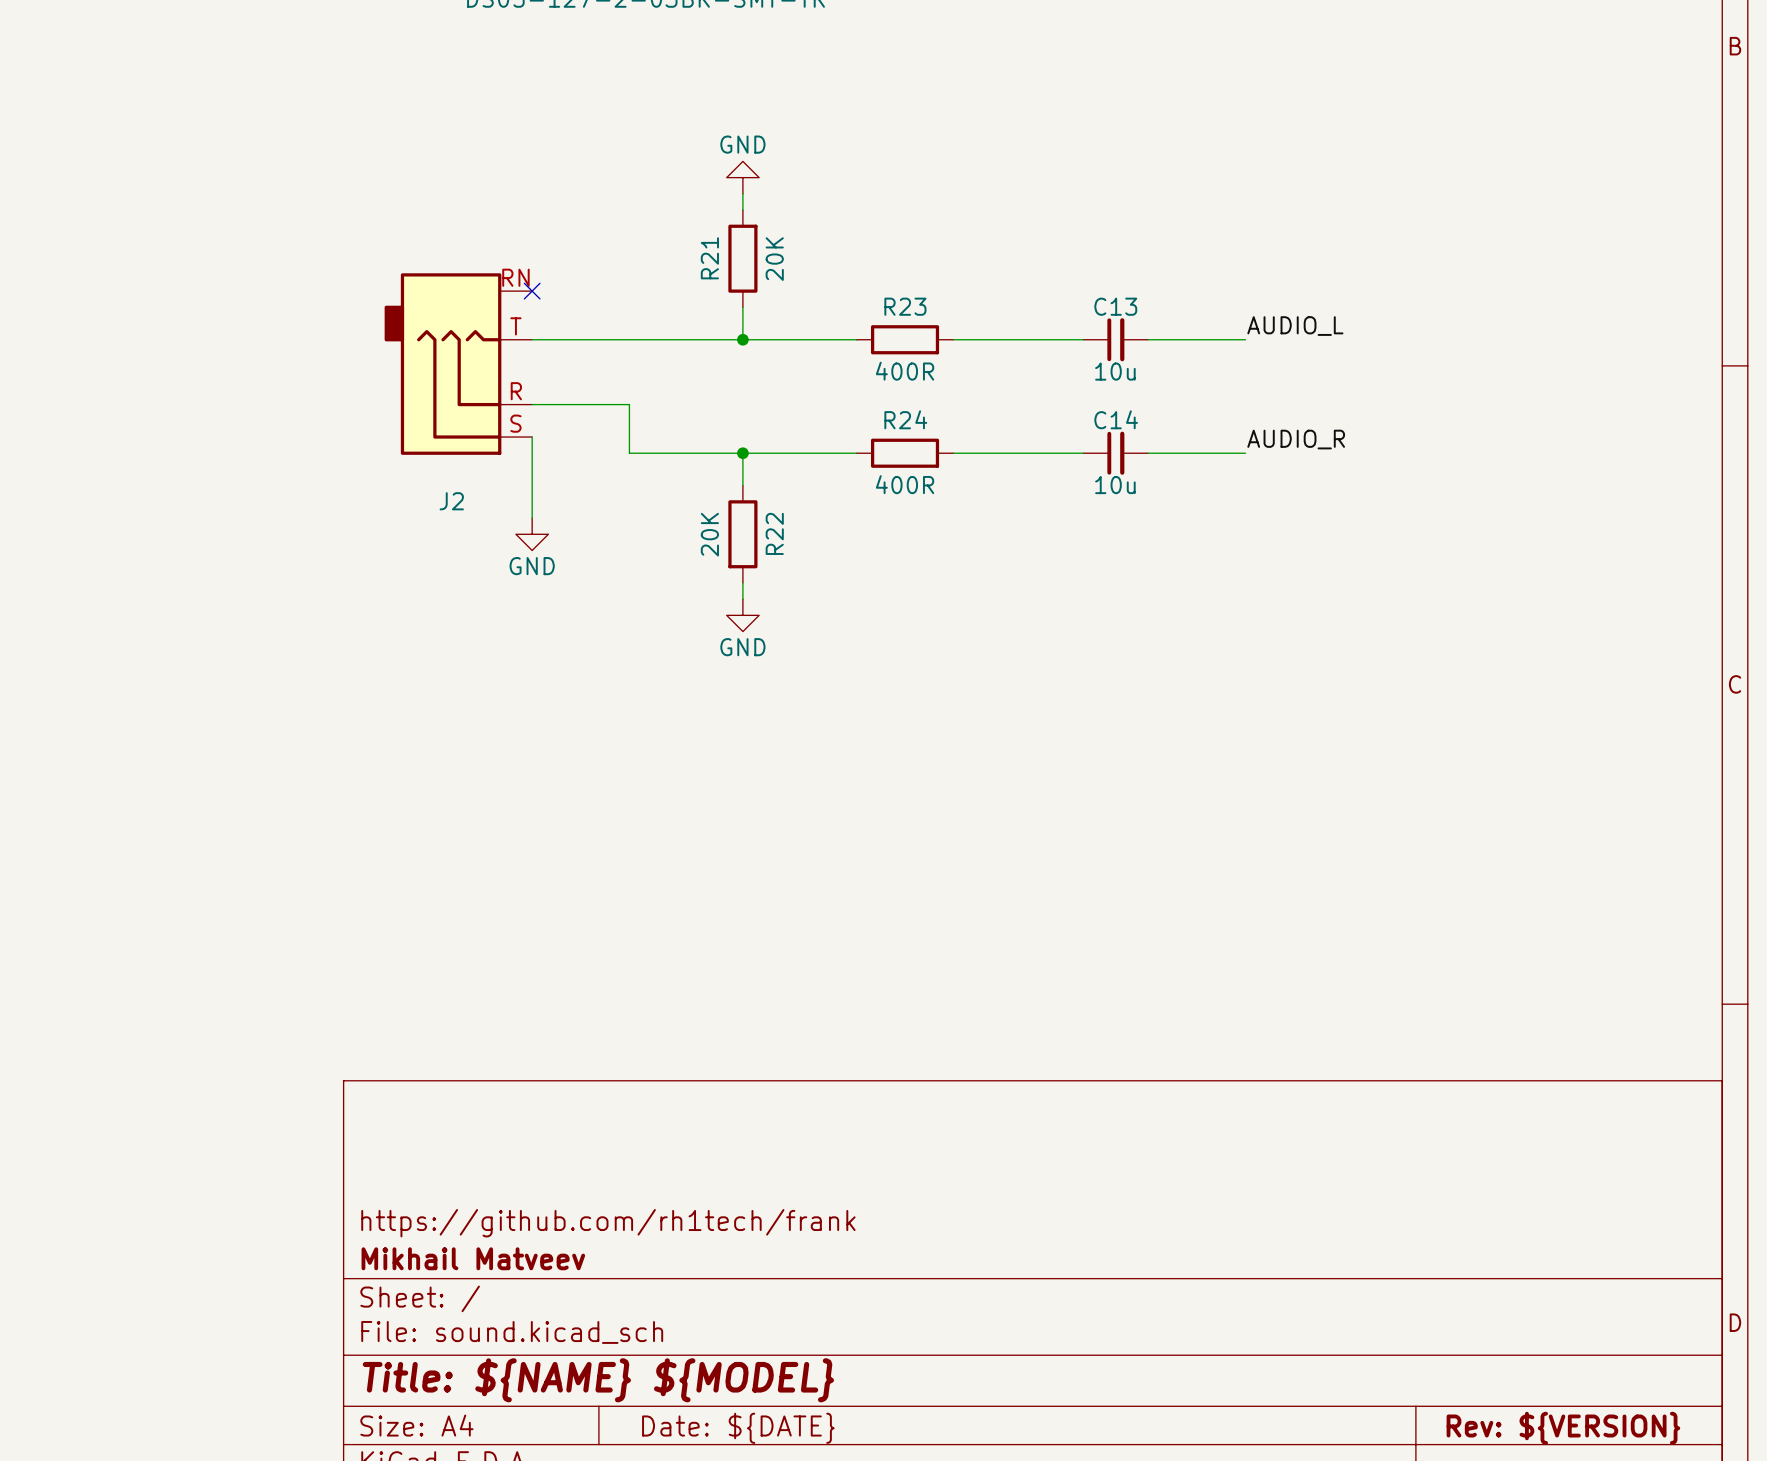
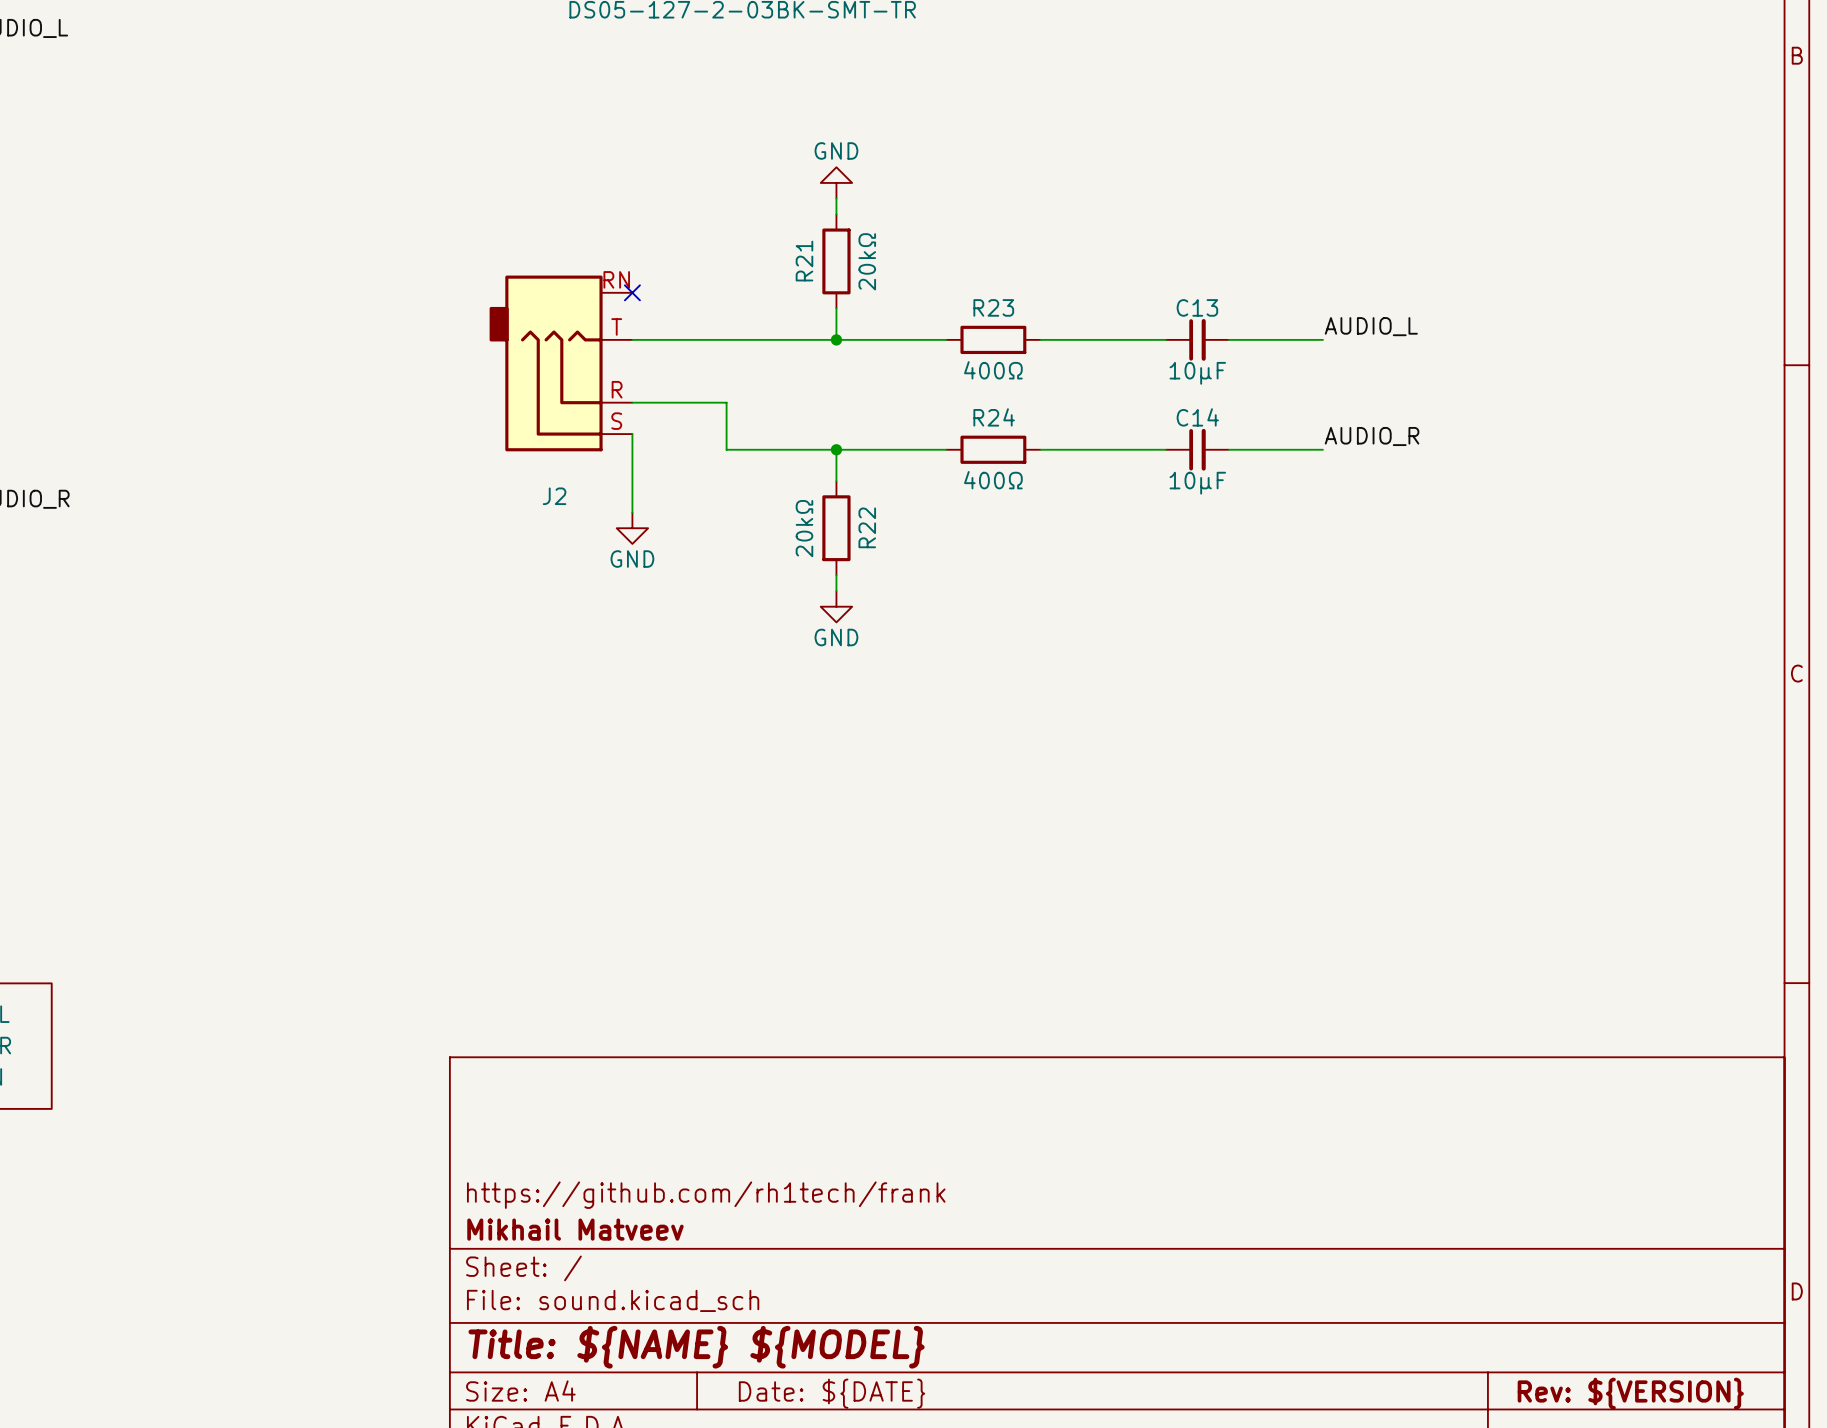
R21 value: 20K (774, 259) -> 20kΩ (867, 261)
R23 value: 400R (905, 371) -> 400Ω (993, 370)
C13 value: 10u (1115, 371) -> 10µF (1197, 373)
R24 value: 400R (905, 484) -> 400Ω (993, 480)
C14 value: 10u (1115, 485) -> 10µF (1197, 483)
R22 value: 20K (709, 534) -> 20kΩ (804, 528)

